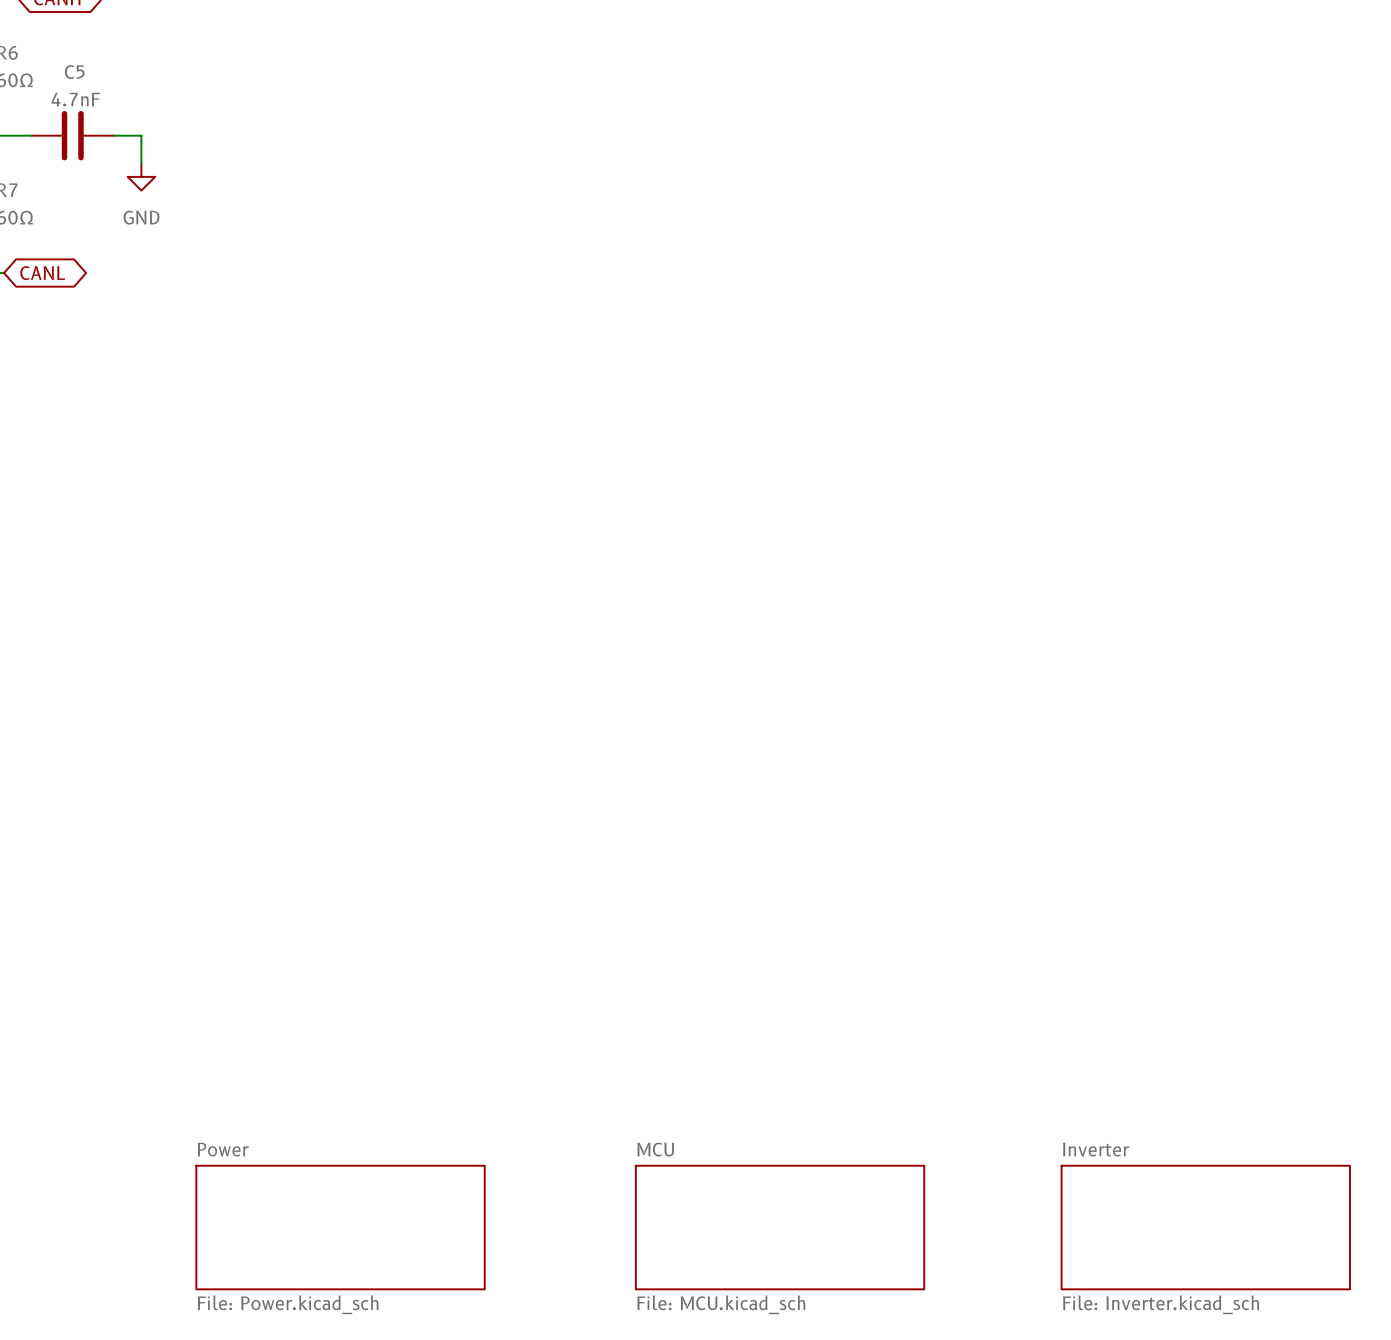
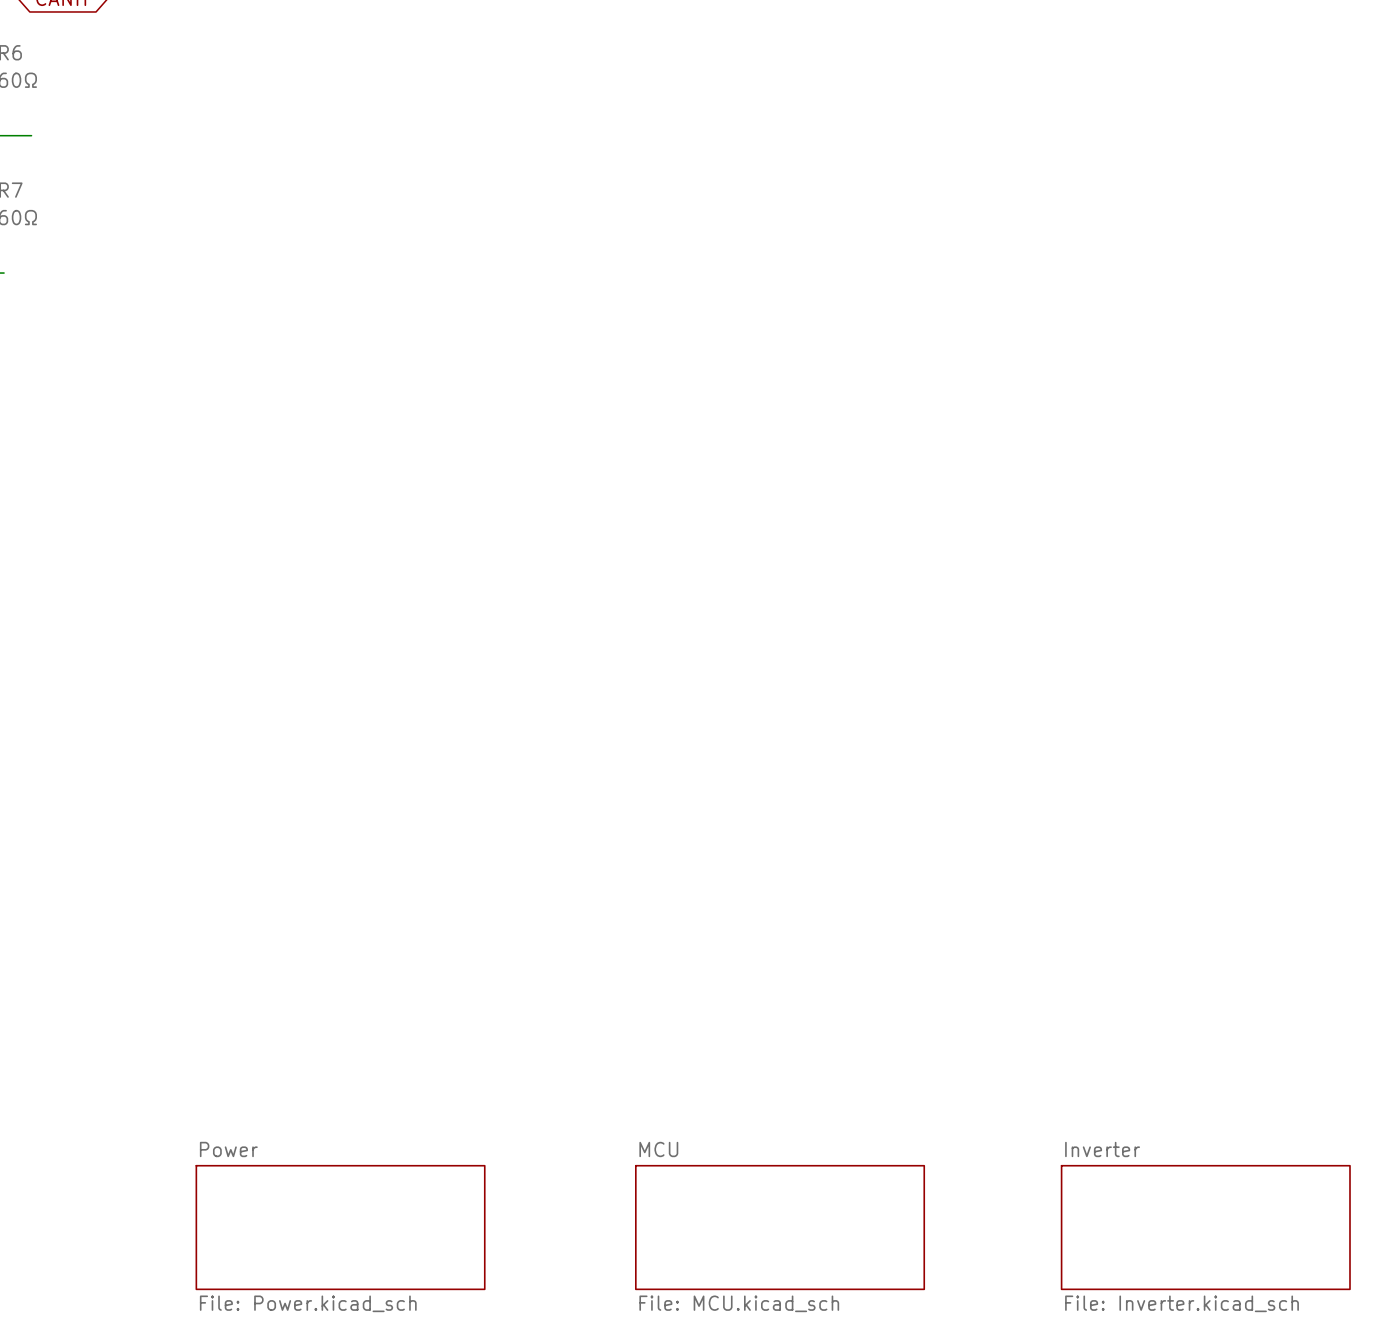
C5: 4.7nF (72, 135) -> none
wire: (113, 135) (141, 135) (141, 163) -> none
power symbol: GND (141, 176) -> none
global label: CANL (42, 273) -> none

